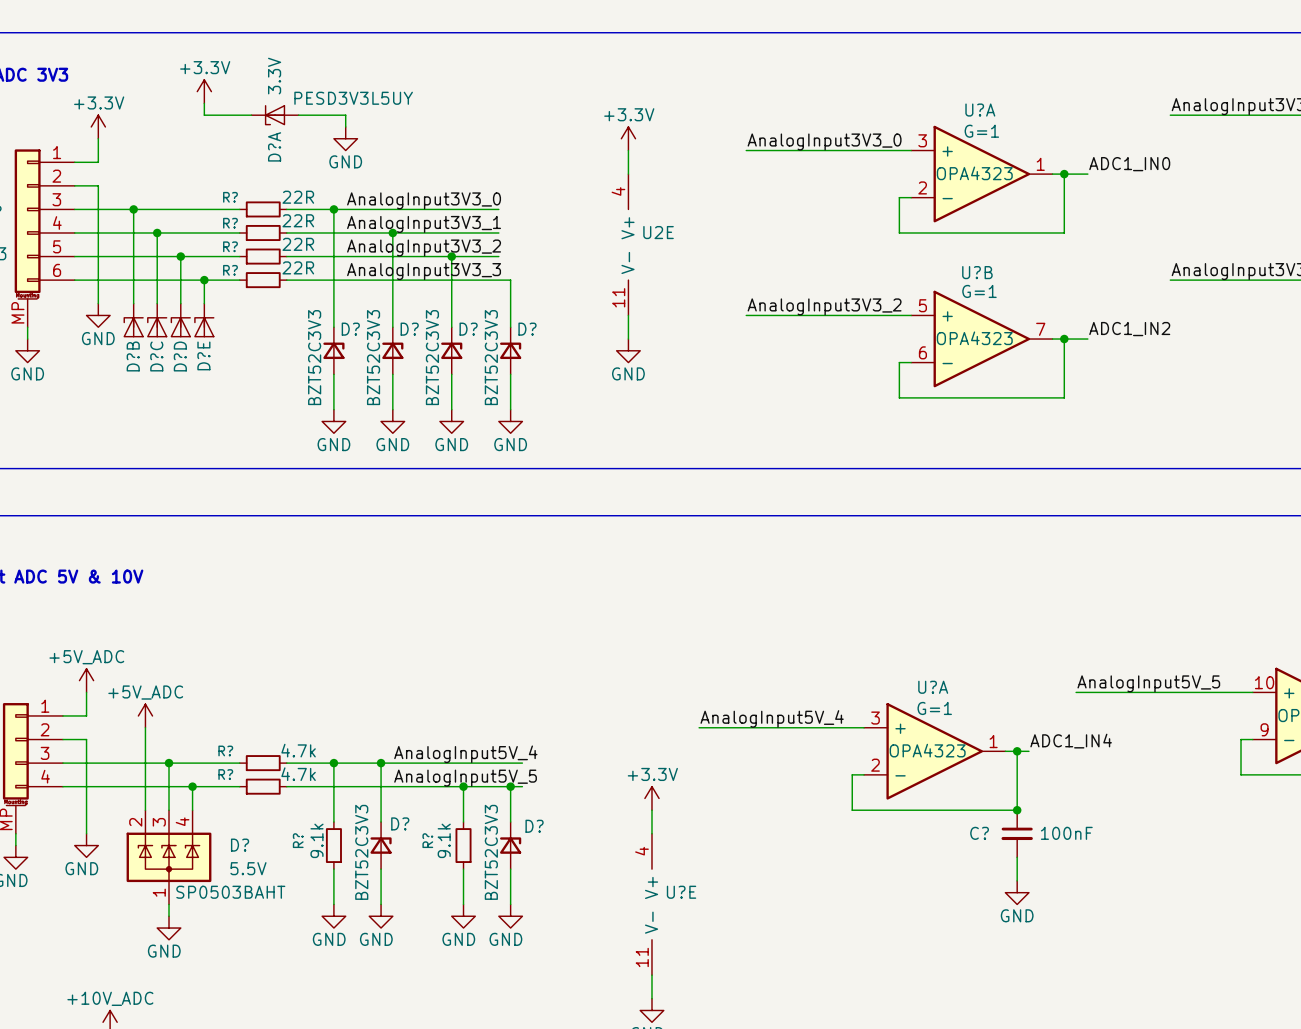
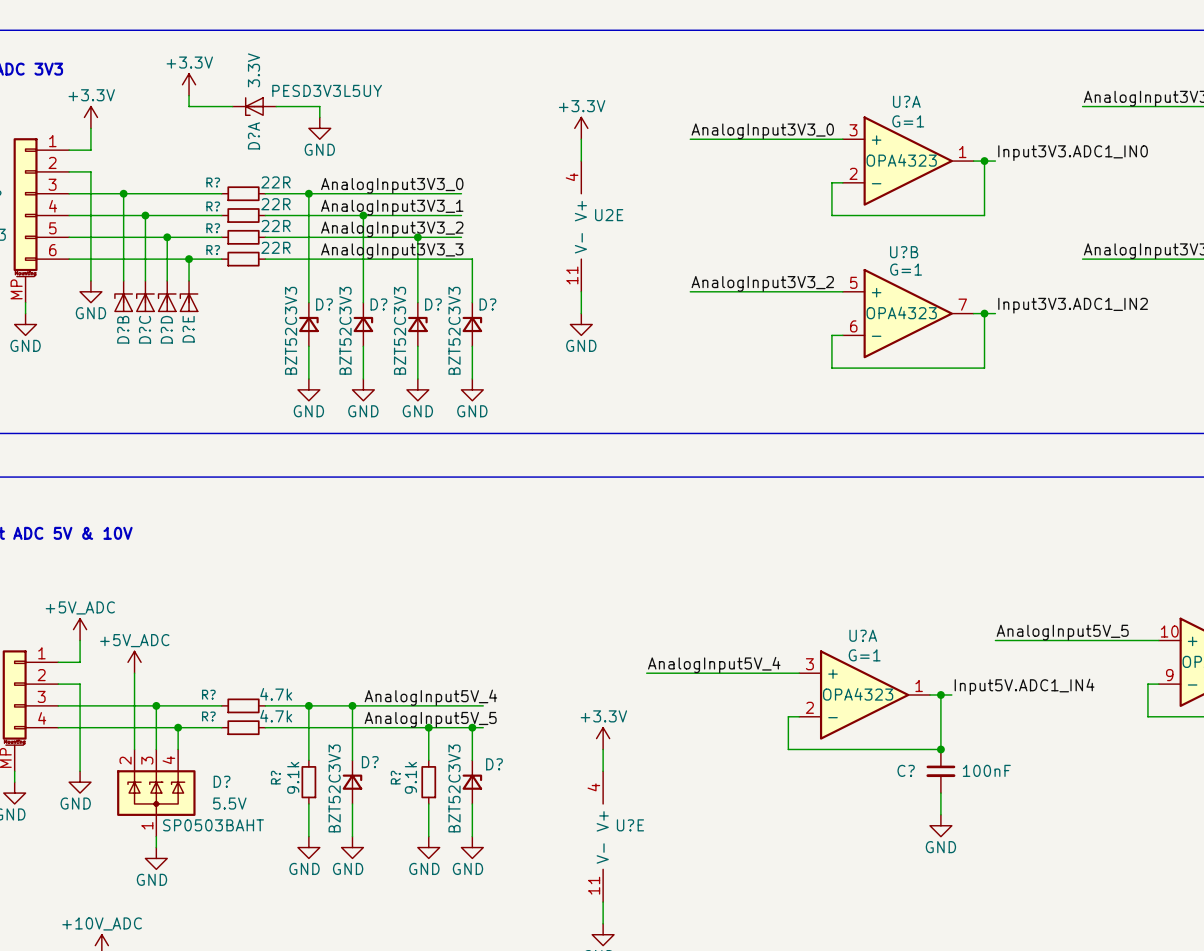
label: ADC1_IN0 (1129, 164) -> Input3V3.ADC1_IN0 (1073, 153)
wire: (1076, 174) (1087, 174) -> none
label: ADC1_IN2 (1129, 329) -> Input3V3.ADC1_IN2 (1073, 305)
wire: (1076, 339) (1087, 339) -> none
label: ADC1_IN4 (1071, 741) -> Input5V.ADC1_IN4 (1024, 686)

